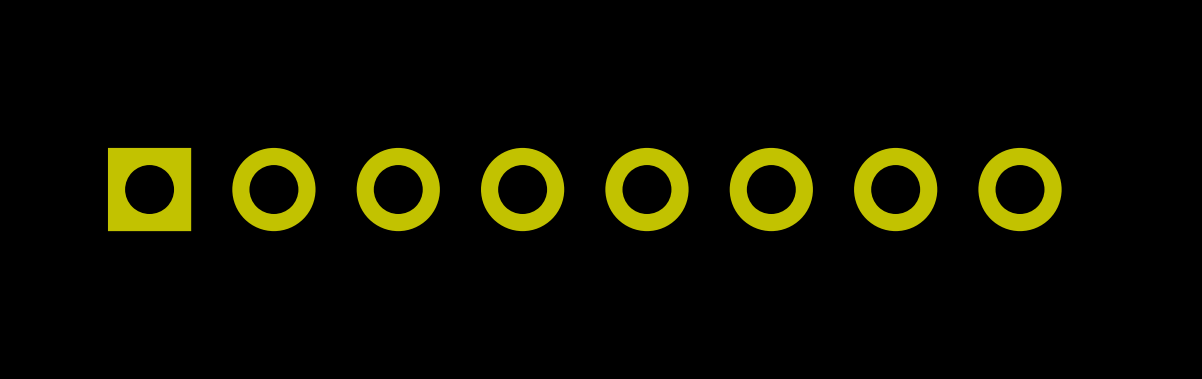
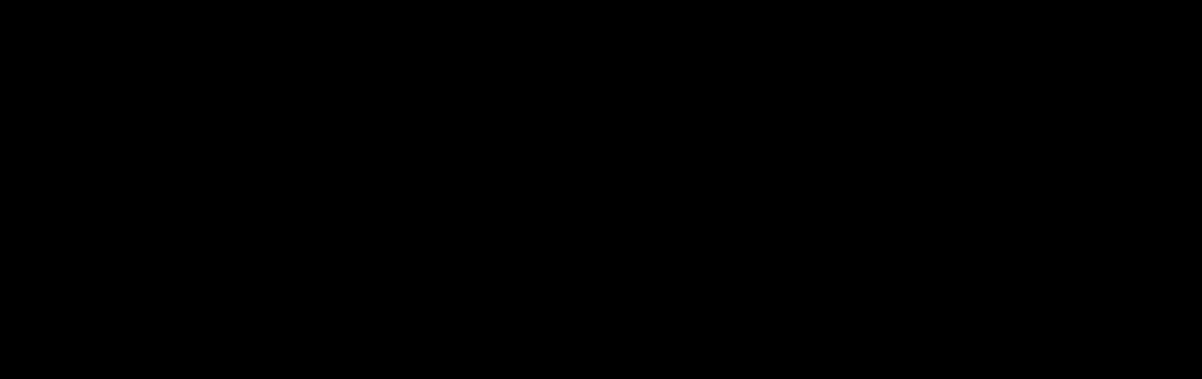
part: (584, 189) -> none

